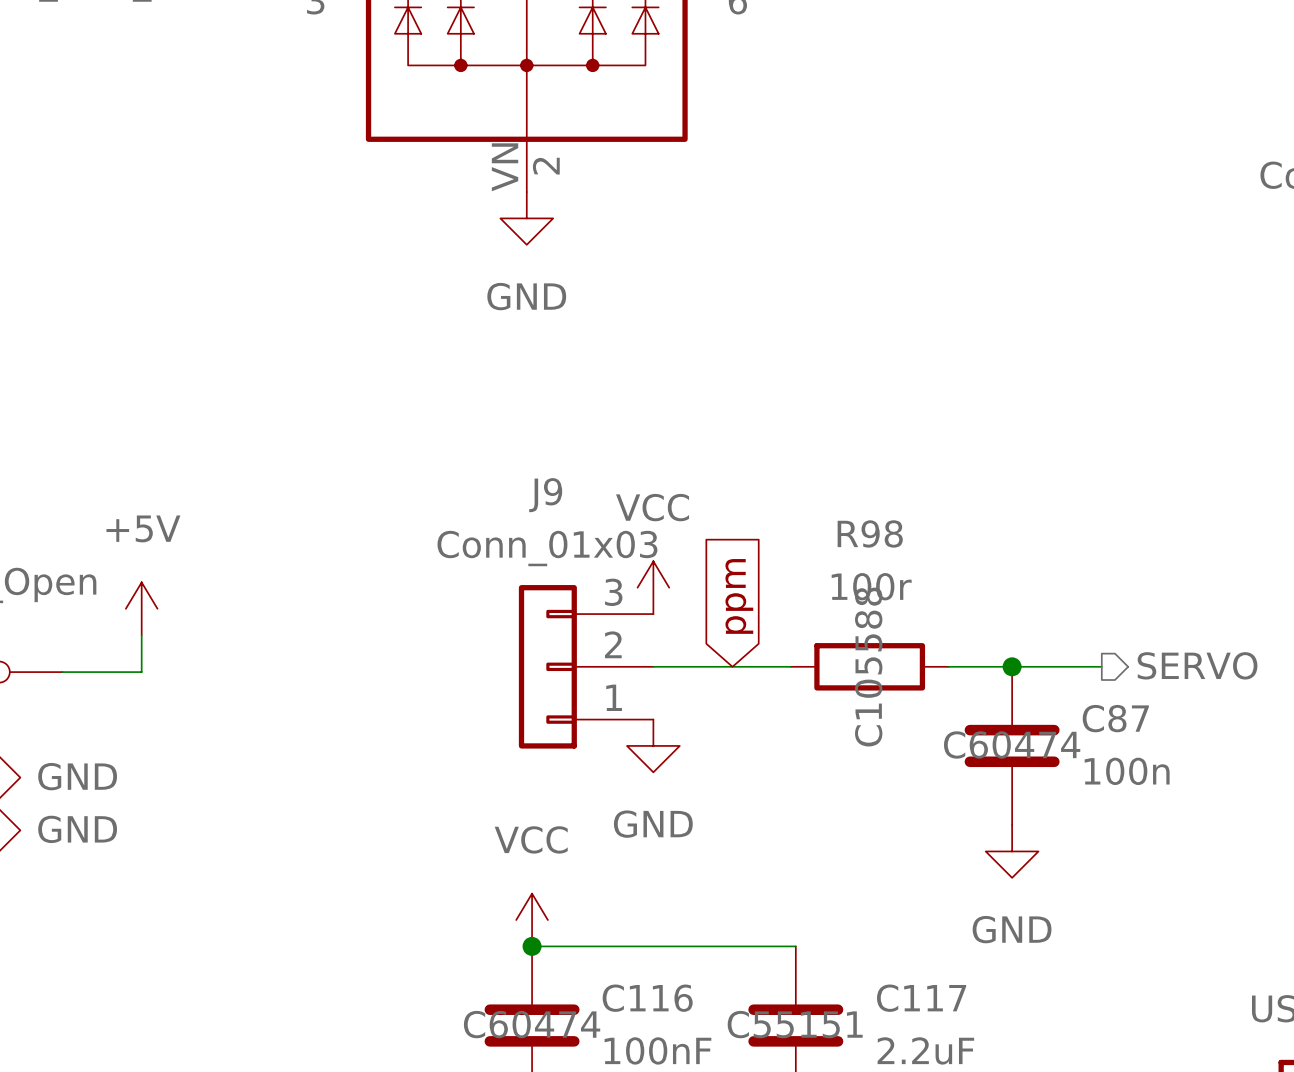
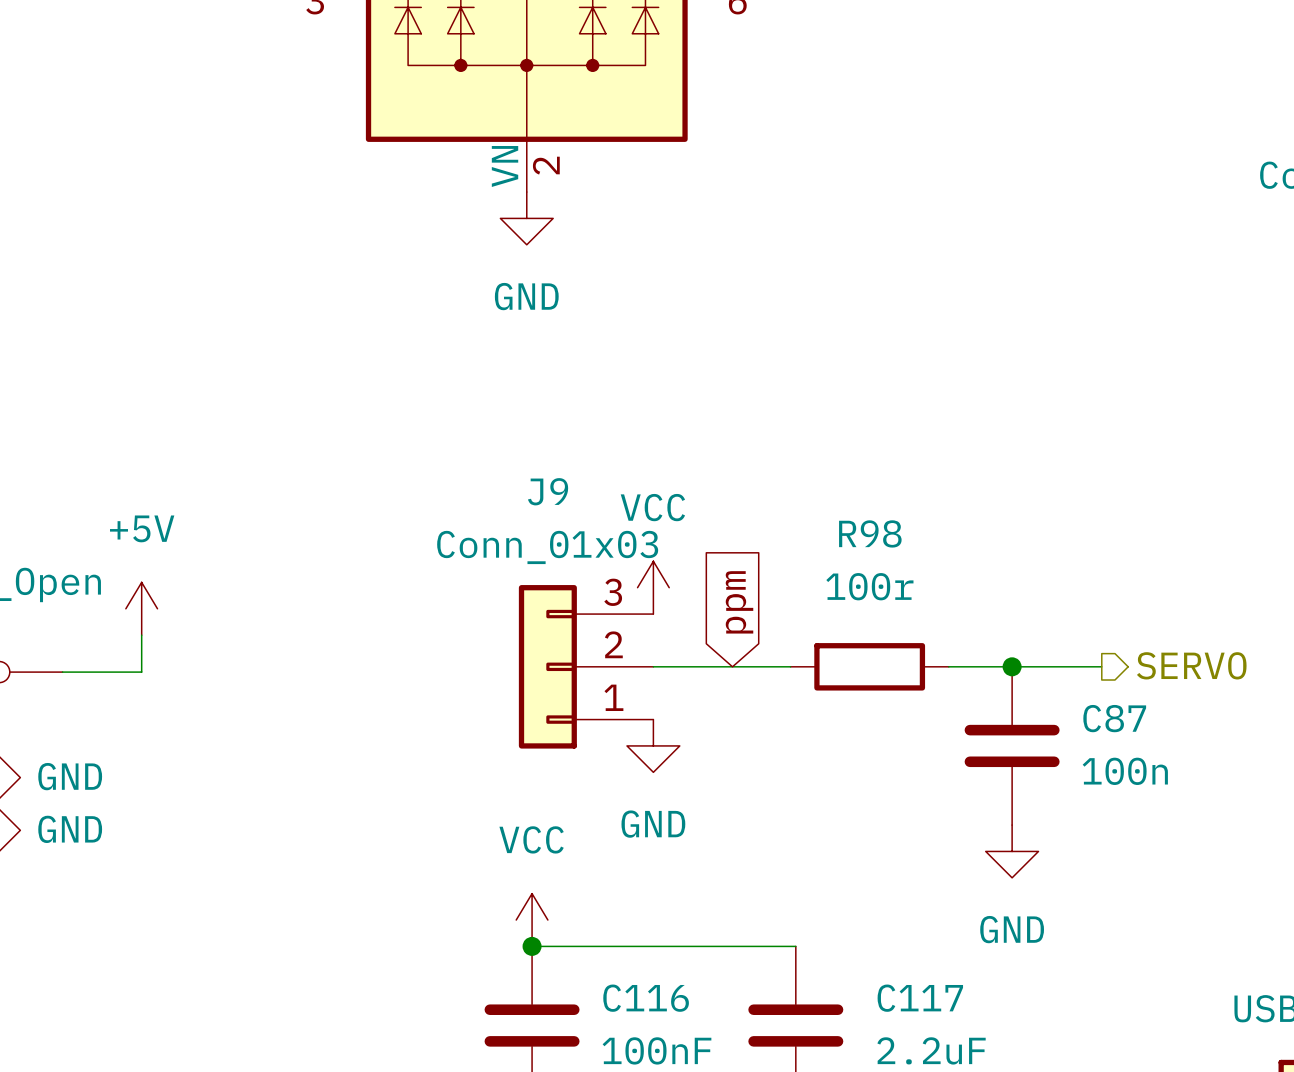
R98 text: C105588 (868, 667) -> none
C87 text: C60474 (1012, 744) -> none
C116 text: C60474 (532, 1024) -> none
C117 text: C55151 (795, 1024) -> none

